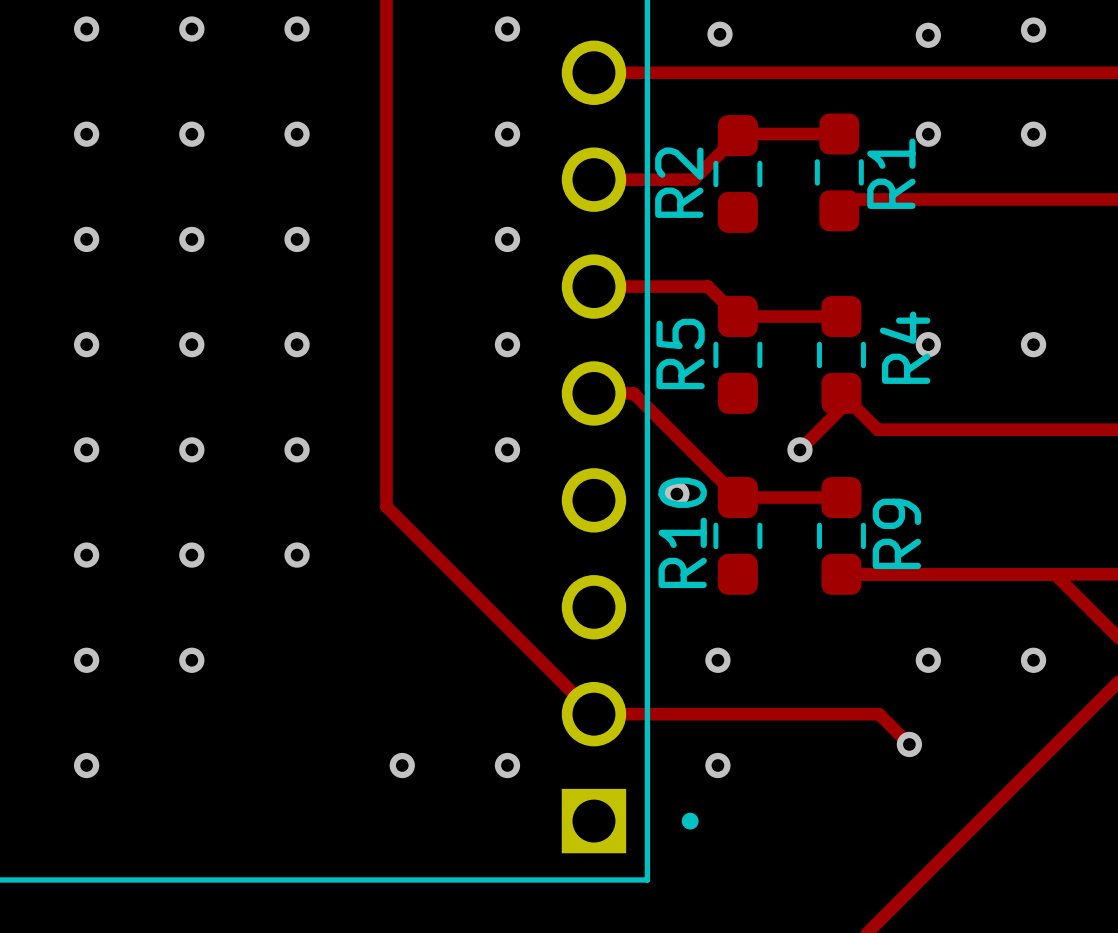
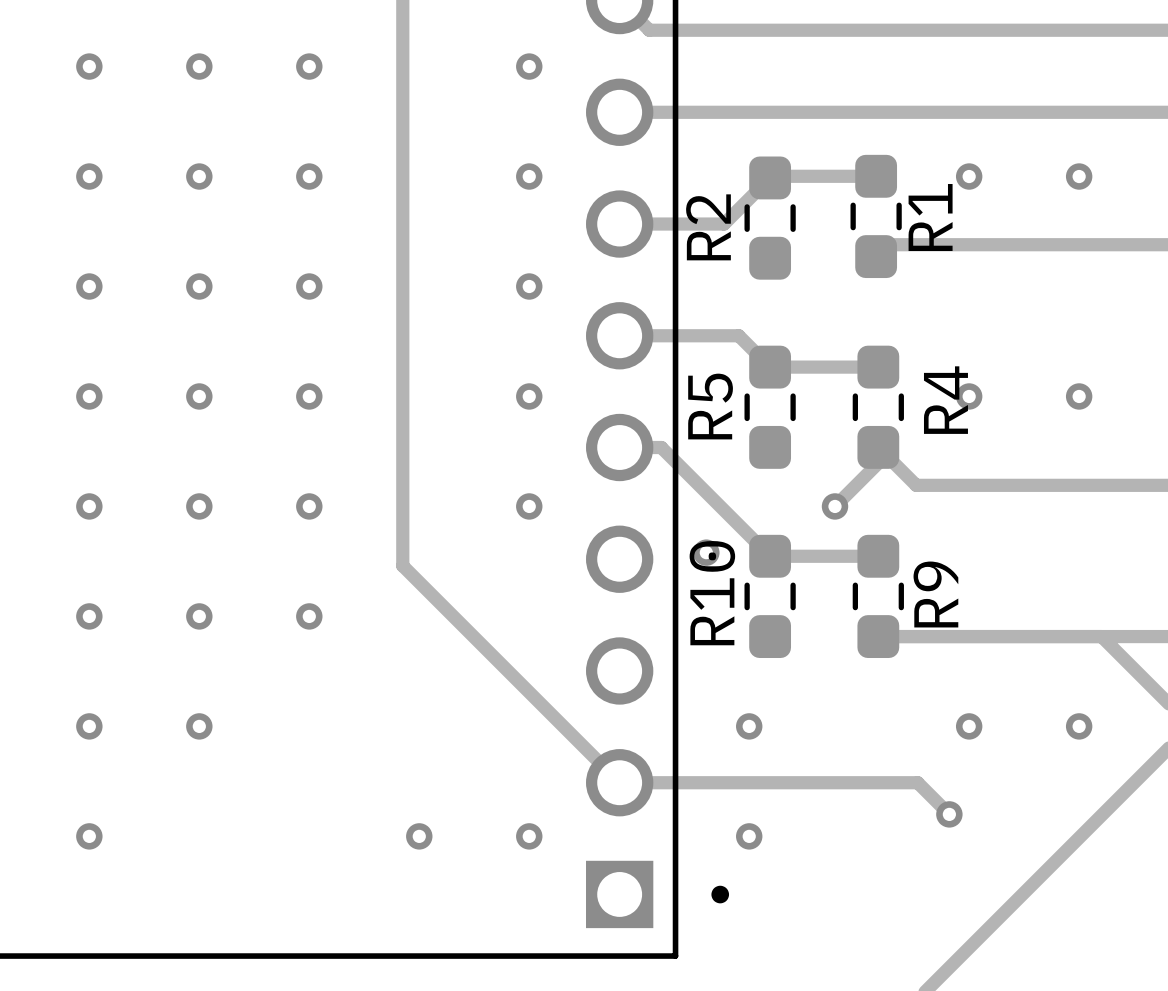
via: (1033, 30) -> none
via: (720, 34) -> none
via: (928, 35) -> none

